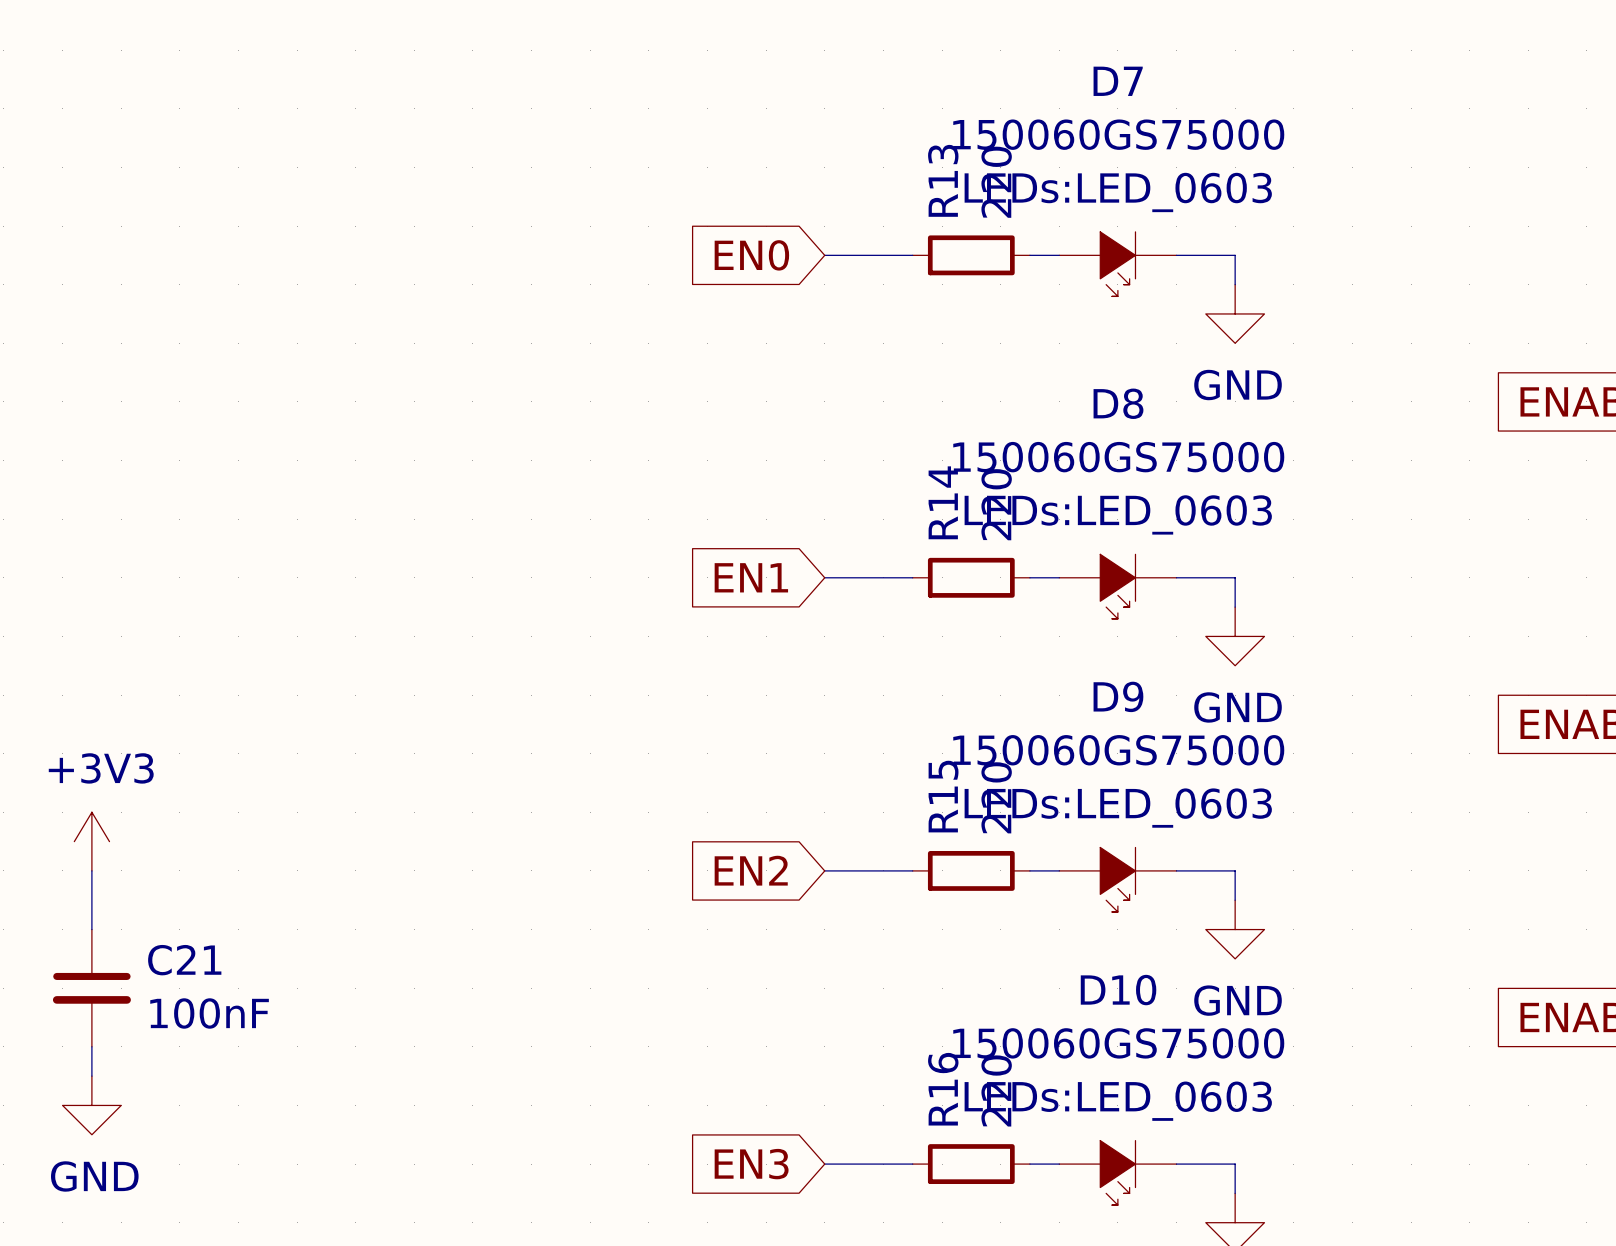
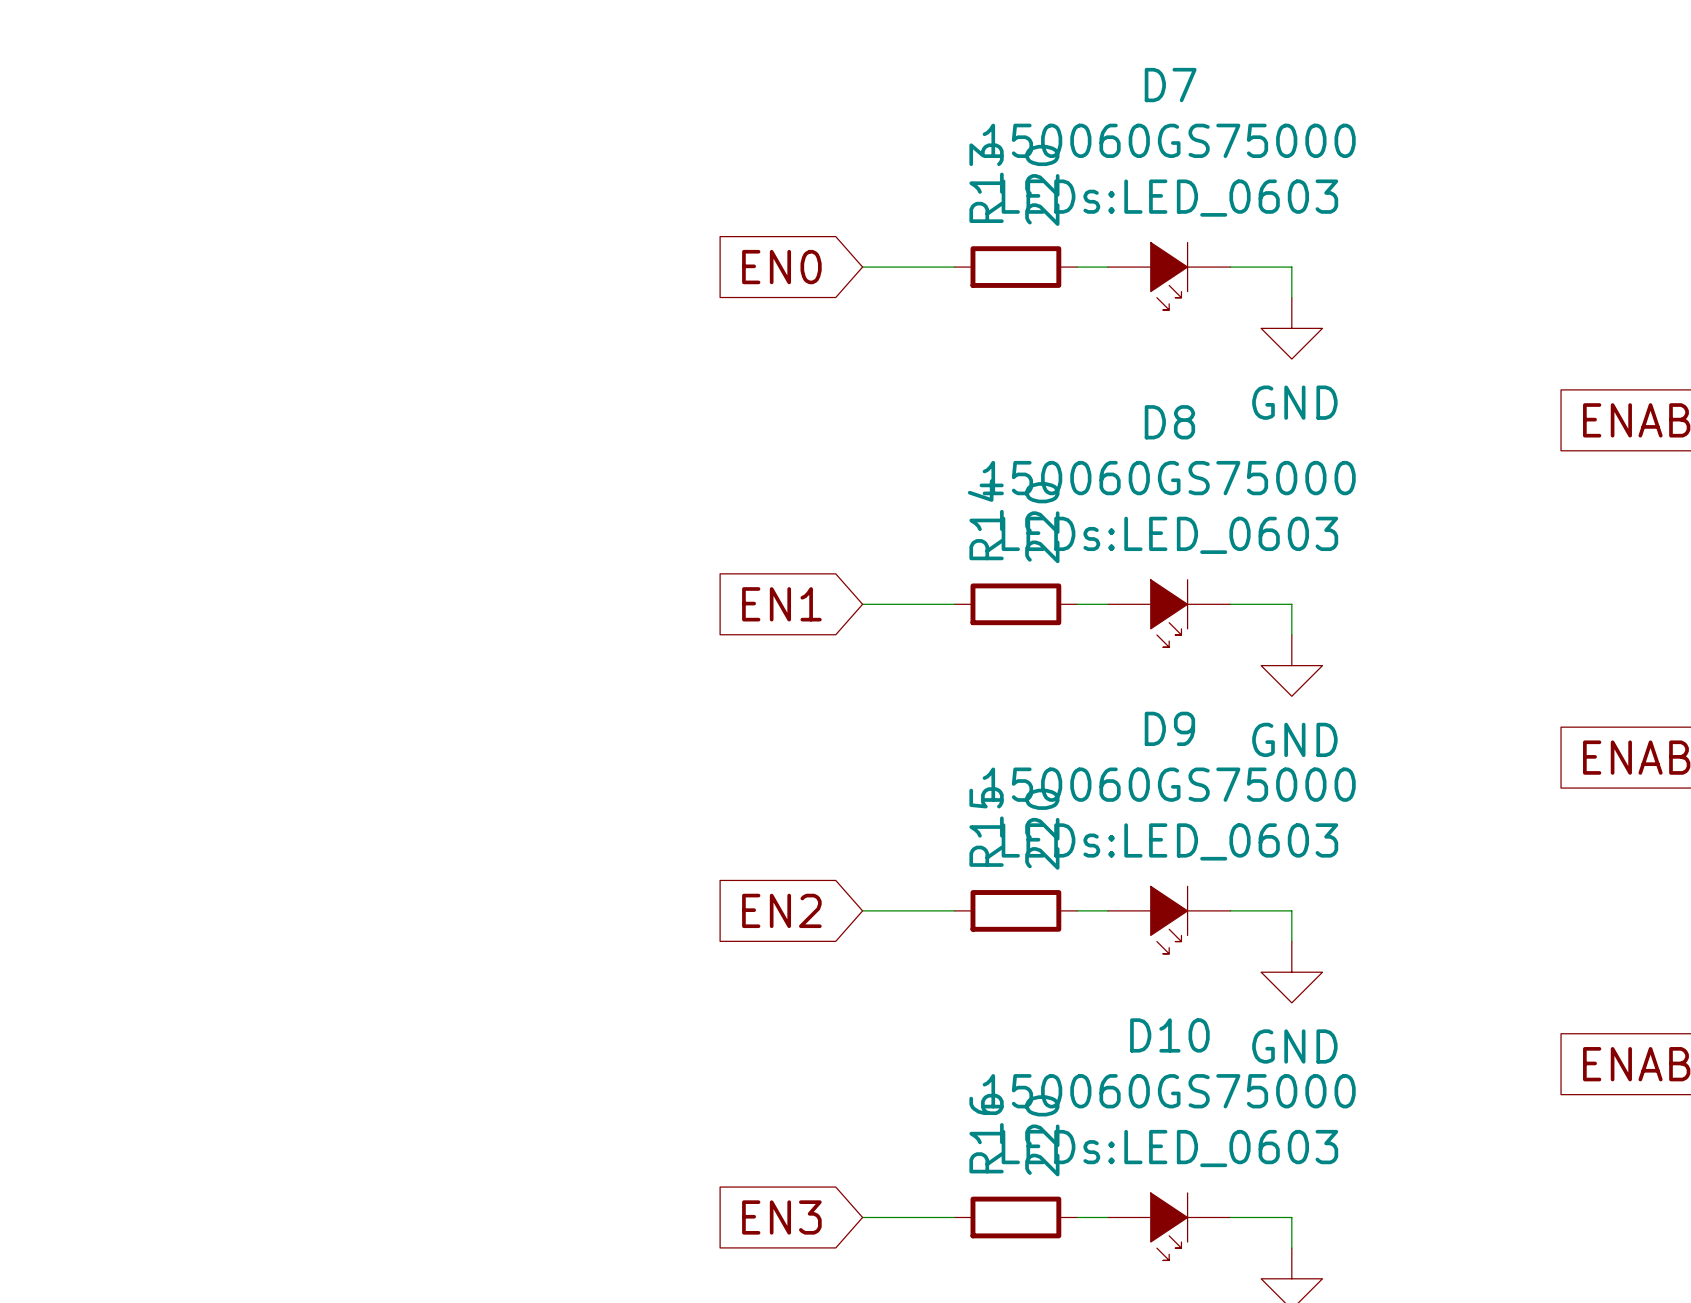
power symbol: +3V3 (91, 841) -> none
wire: (91, 870) (91, 929) -> none
C21: 100nF (91, 988) -> none
wire: (91, 1046) (91, 1076) -> none
power symbol: GND (91, 1105) -> none

